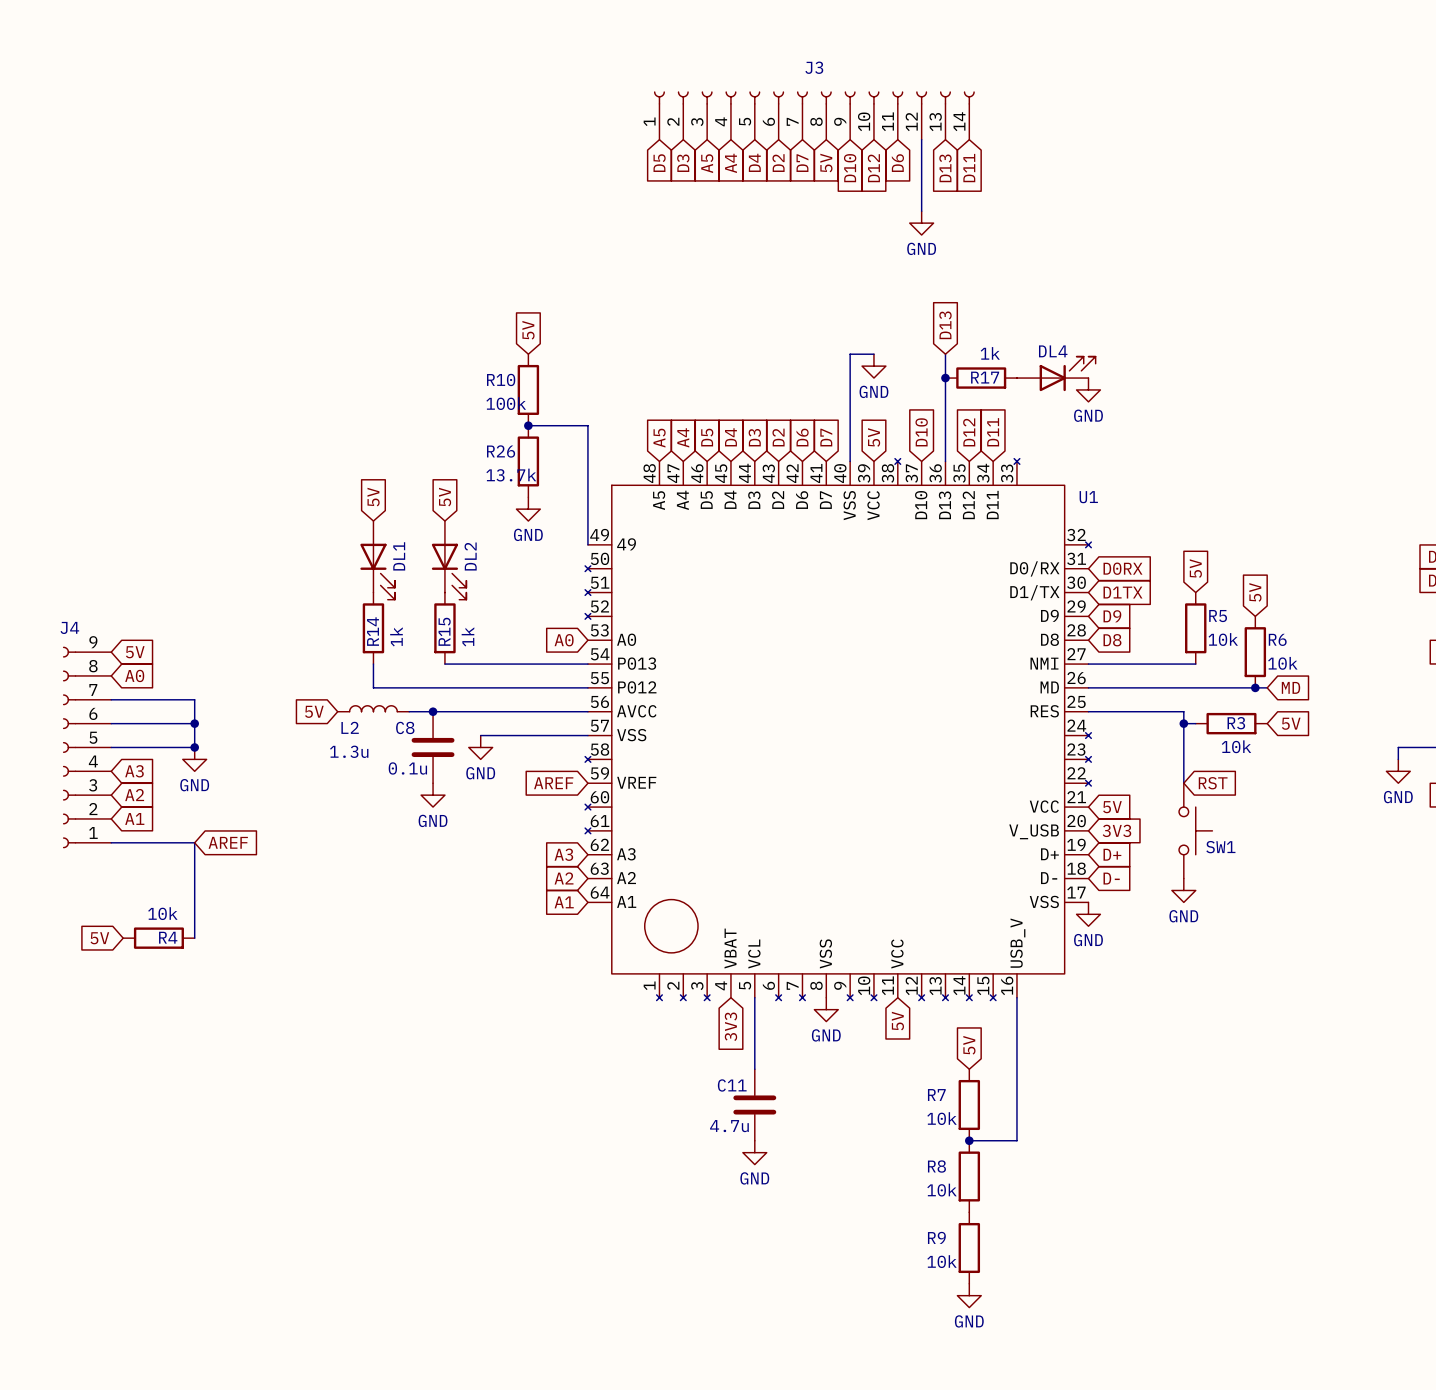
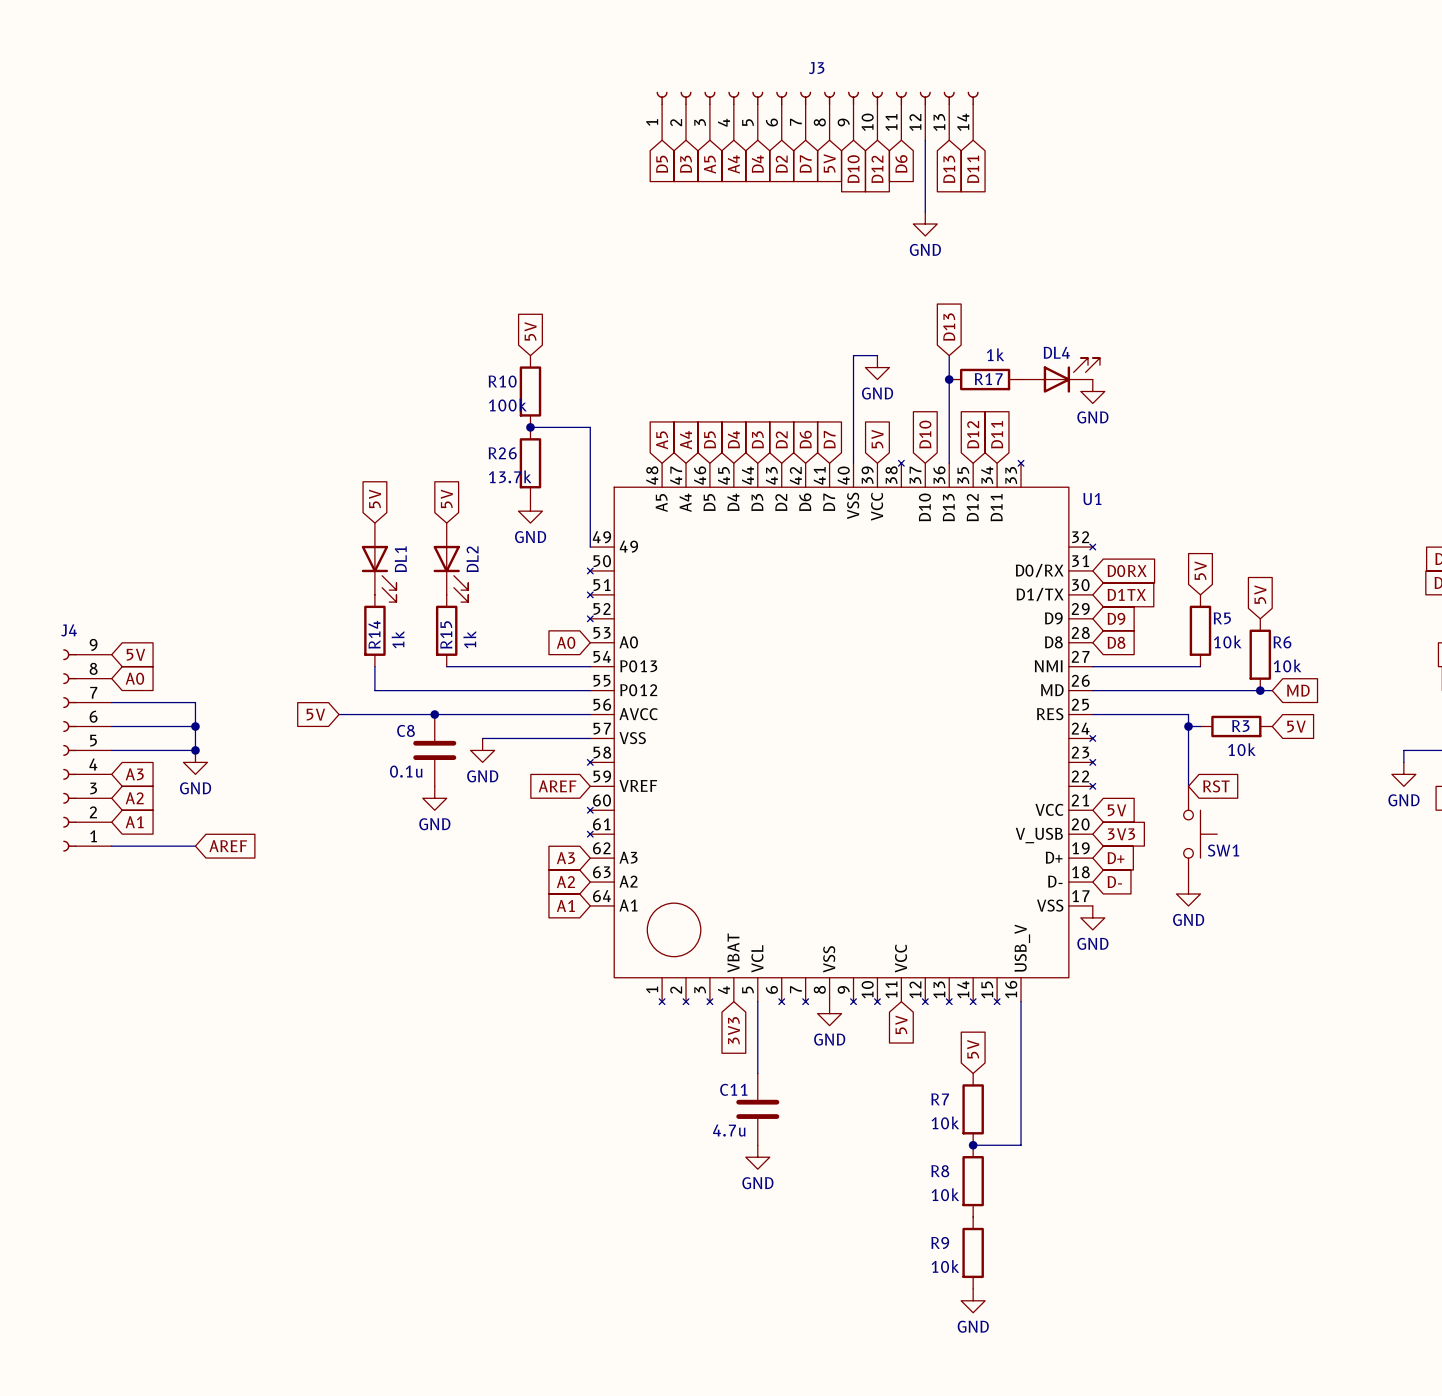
L2: 1.3u (373, 708) -> none
wire: none -> (339, 714) (410, 714)
wire: (194, 842) (194, 938) -> none
global label: 5V (99, 938) -> none
R4: 10k (158, 938) -> none

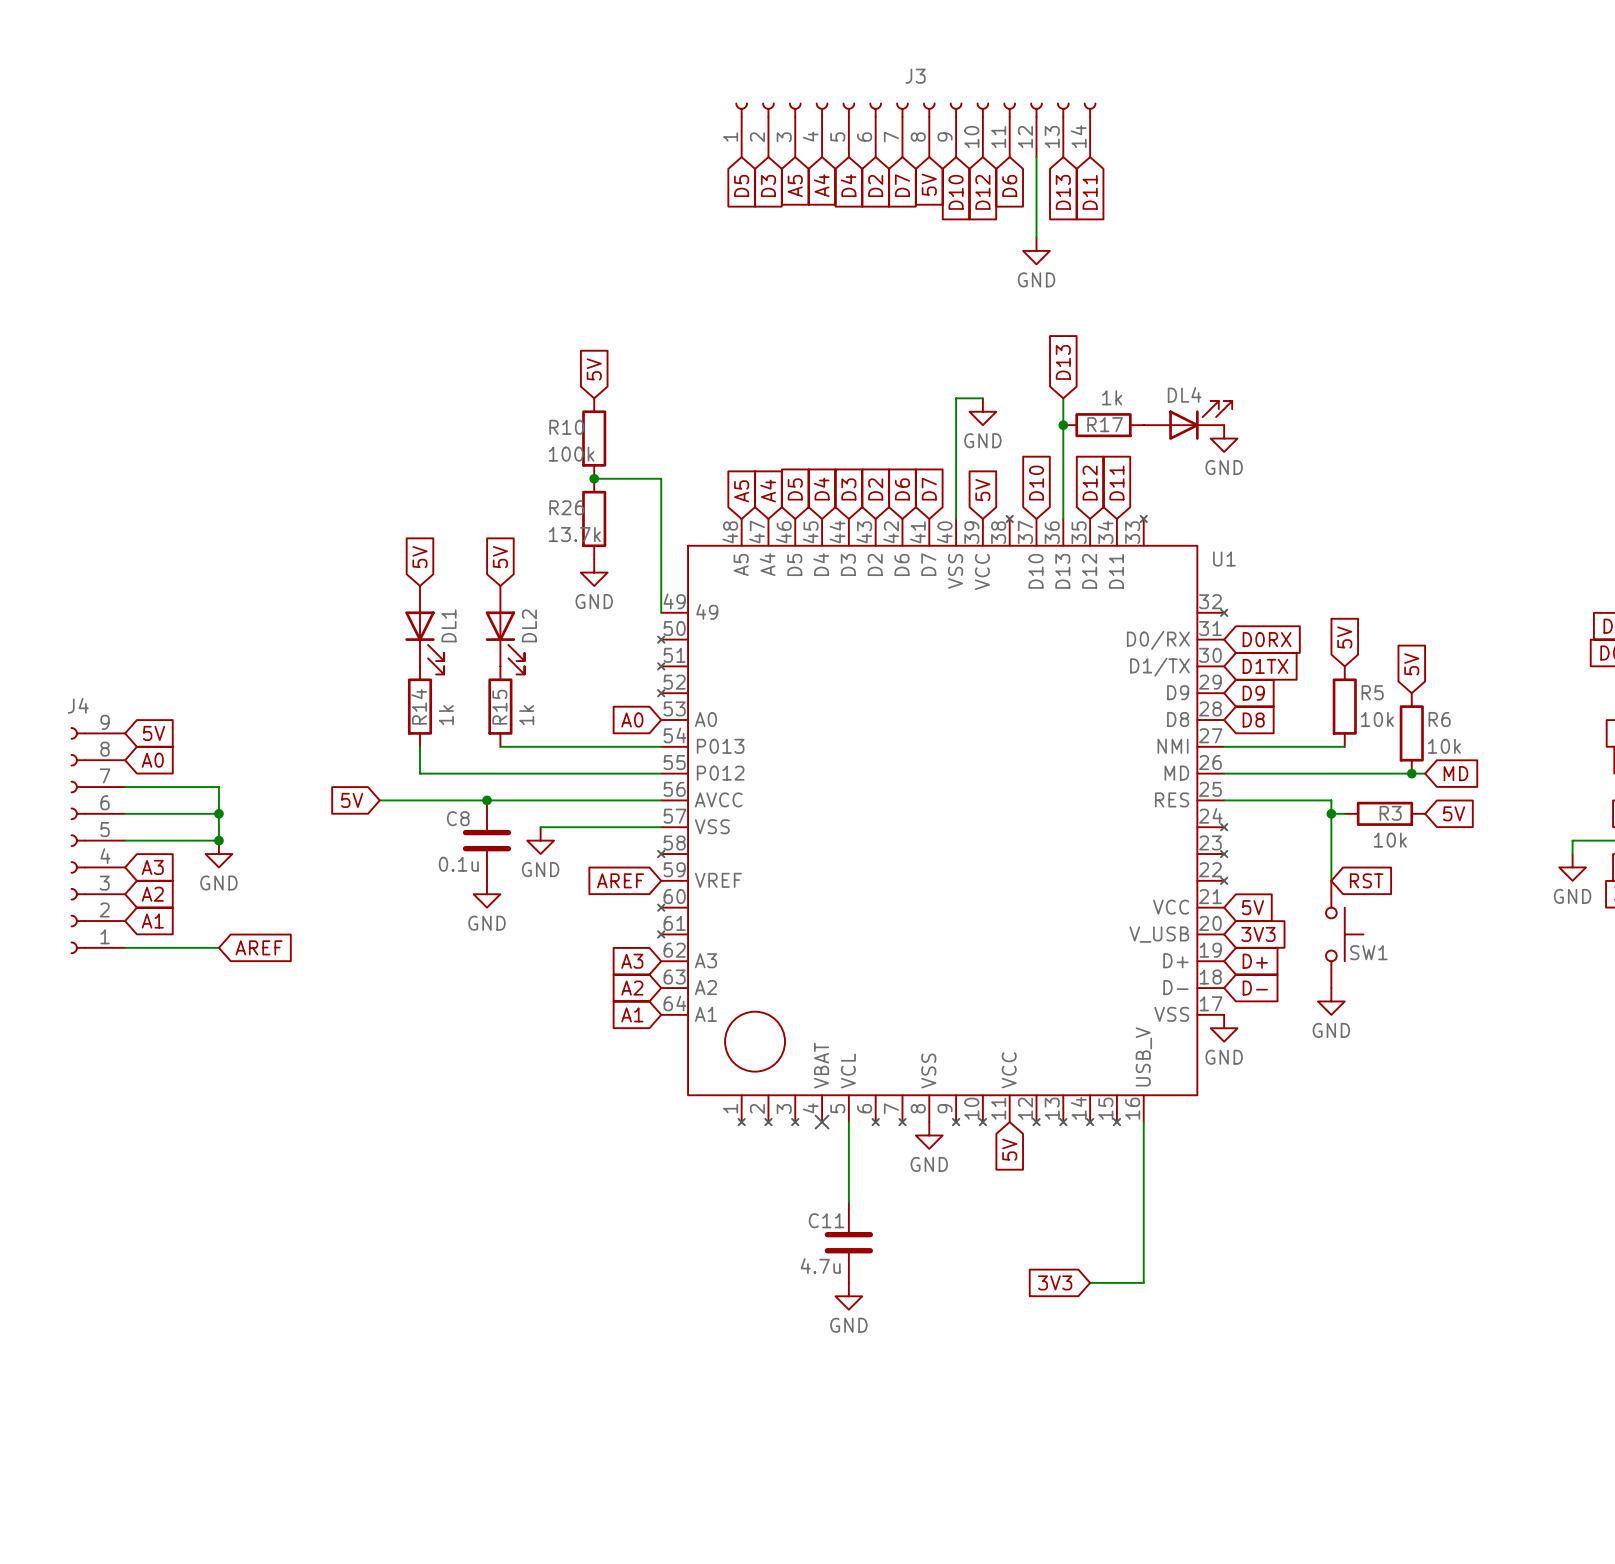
no-connect mark: none -> (822, 1122)
global label: 3V3 (733, 1030) -> none
global label: 5V (973, 1049) -> none
R7: 10k (973, 1109) -> none
global label: none -> 3V3 (1055, 1282)
junction: (973, 1145) -> none
R8: 10k (973, 1181) -> none
R9: 10k (973, 1252) -> none
power symbol: GND (973, 1300) -> none

